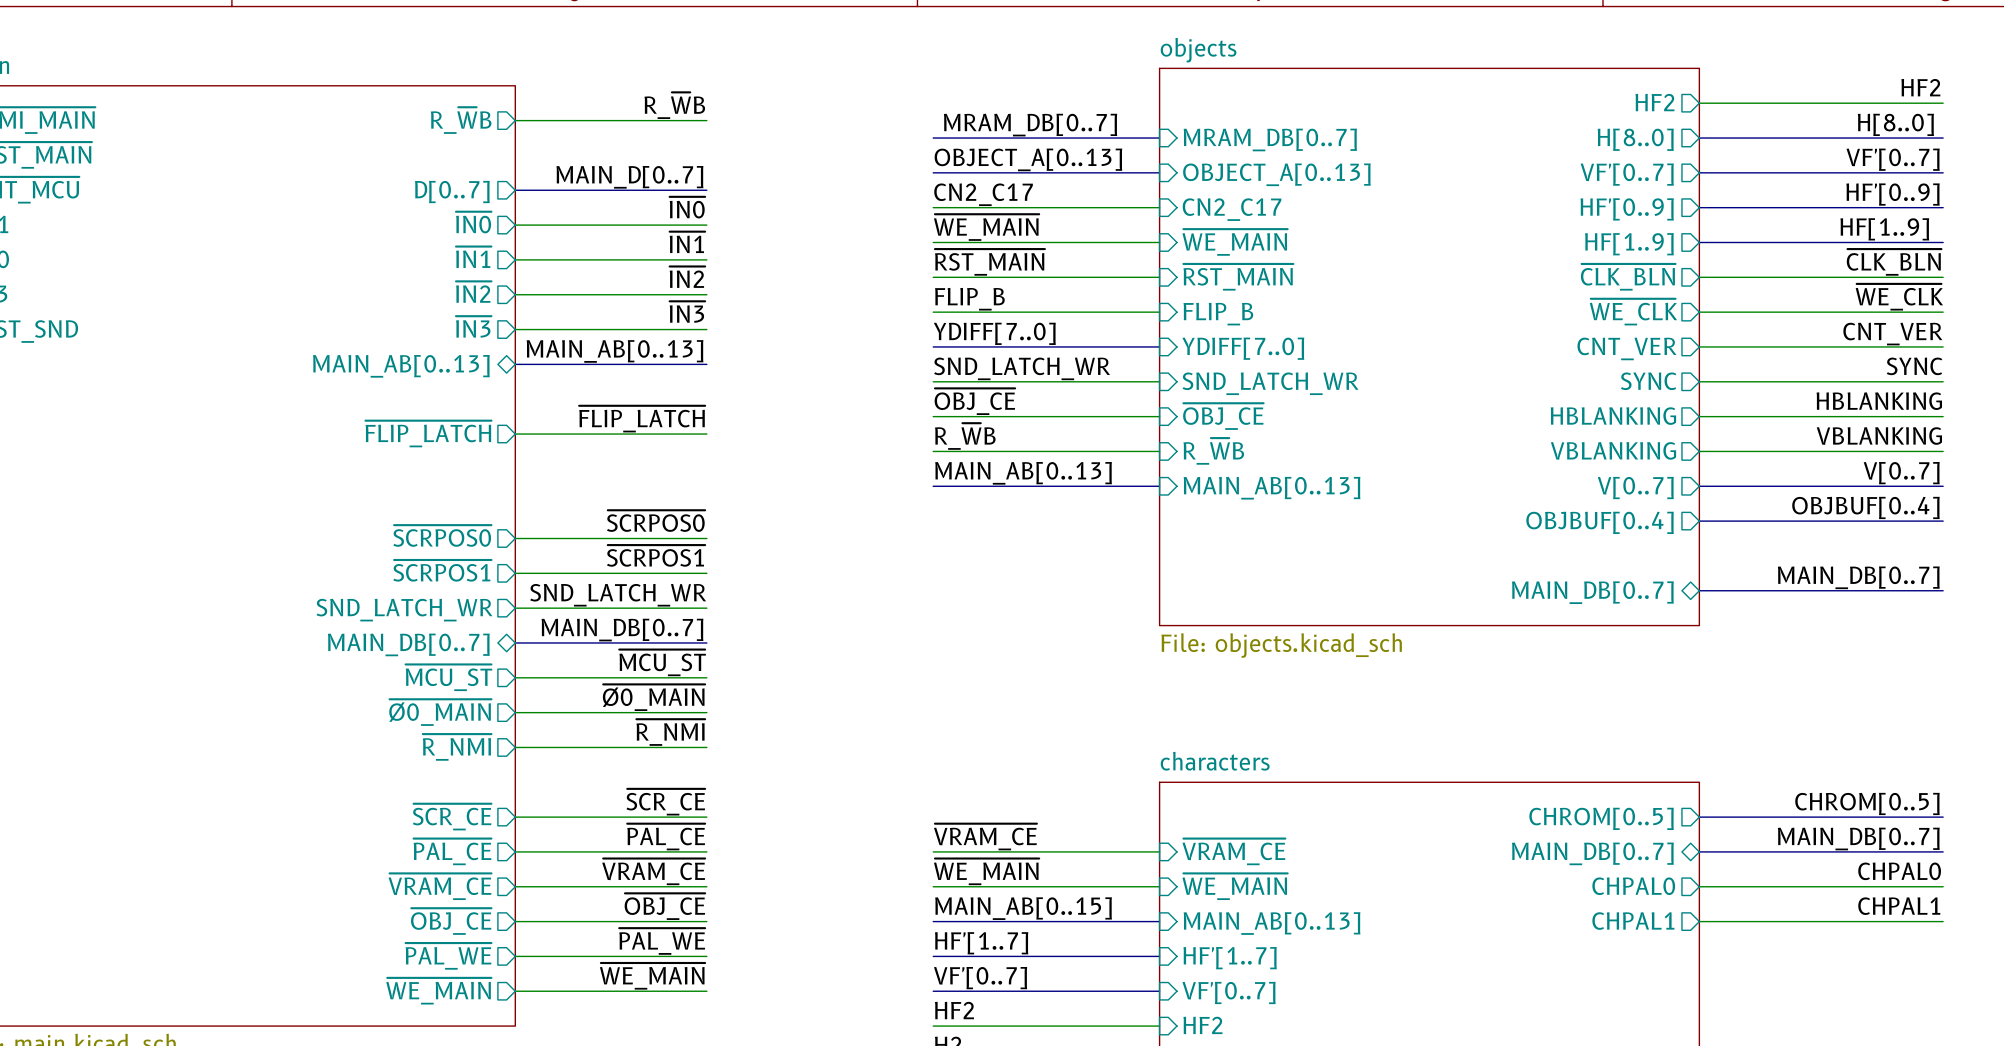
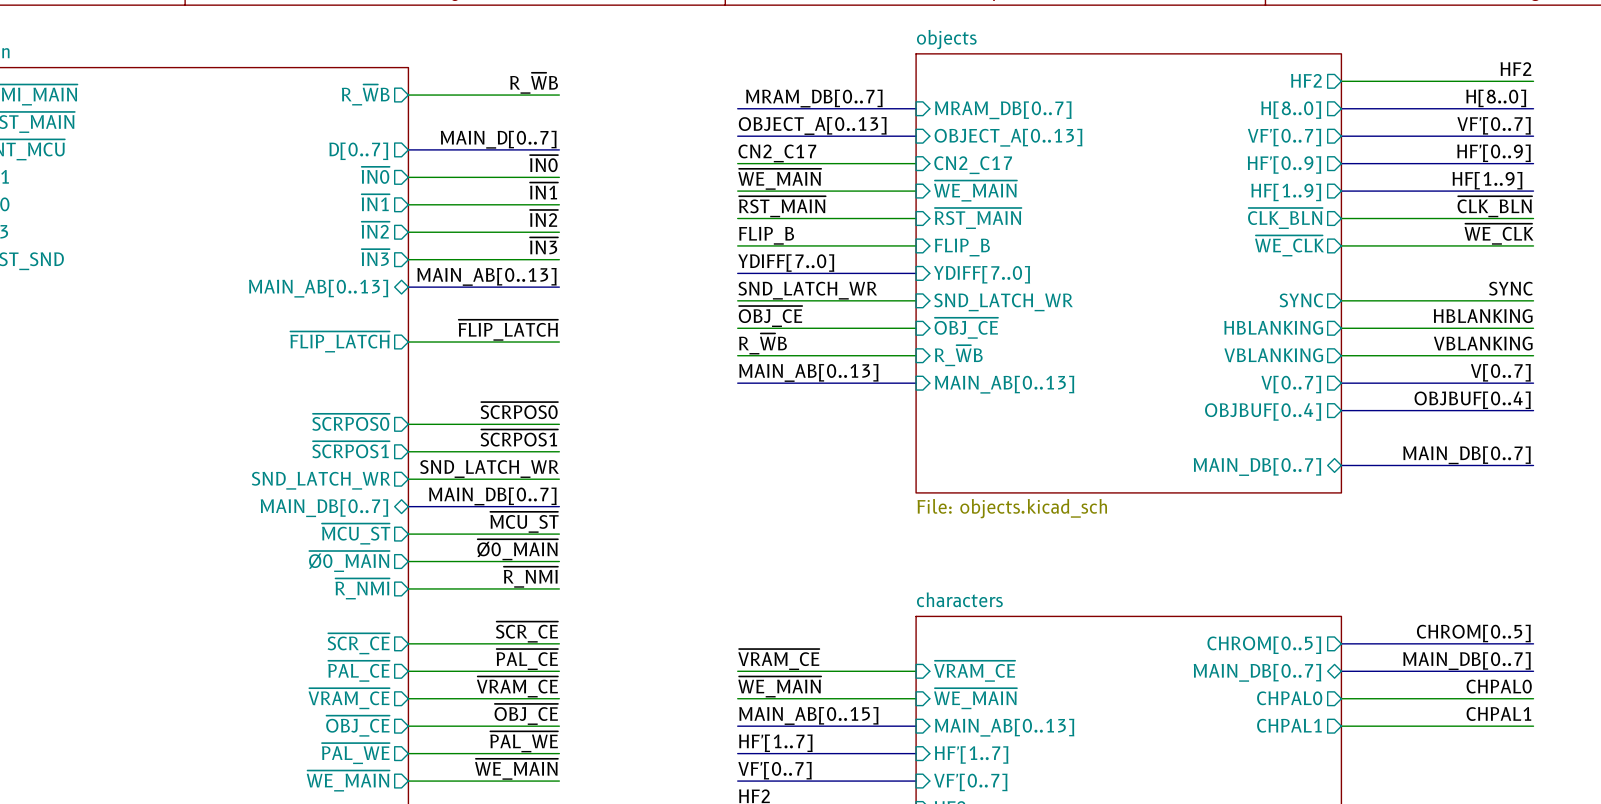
label: CNT_VER (1892, 334) -> none
wire: (1699, 346) (1943, 346) -> none
sheet pin: CNT_VER (1626, 348) -> none

